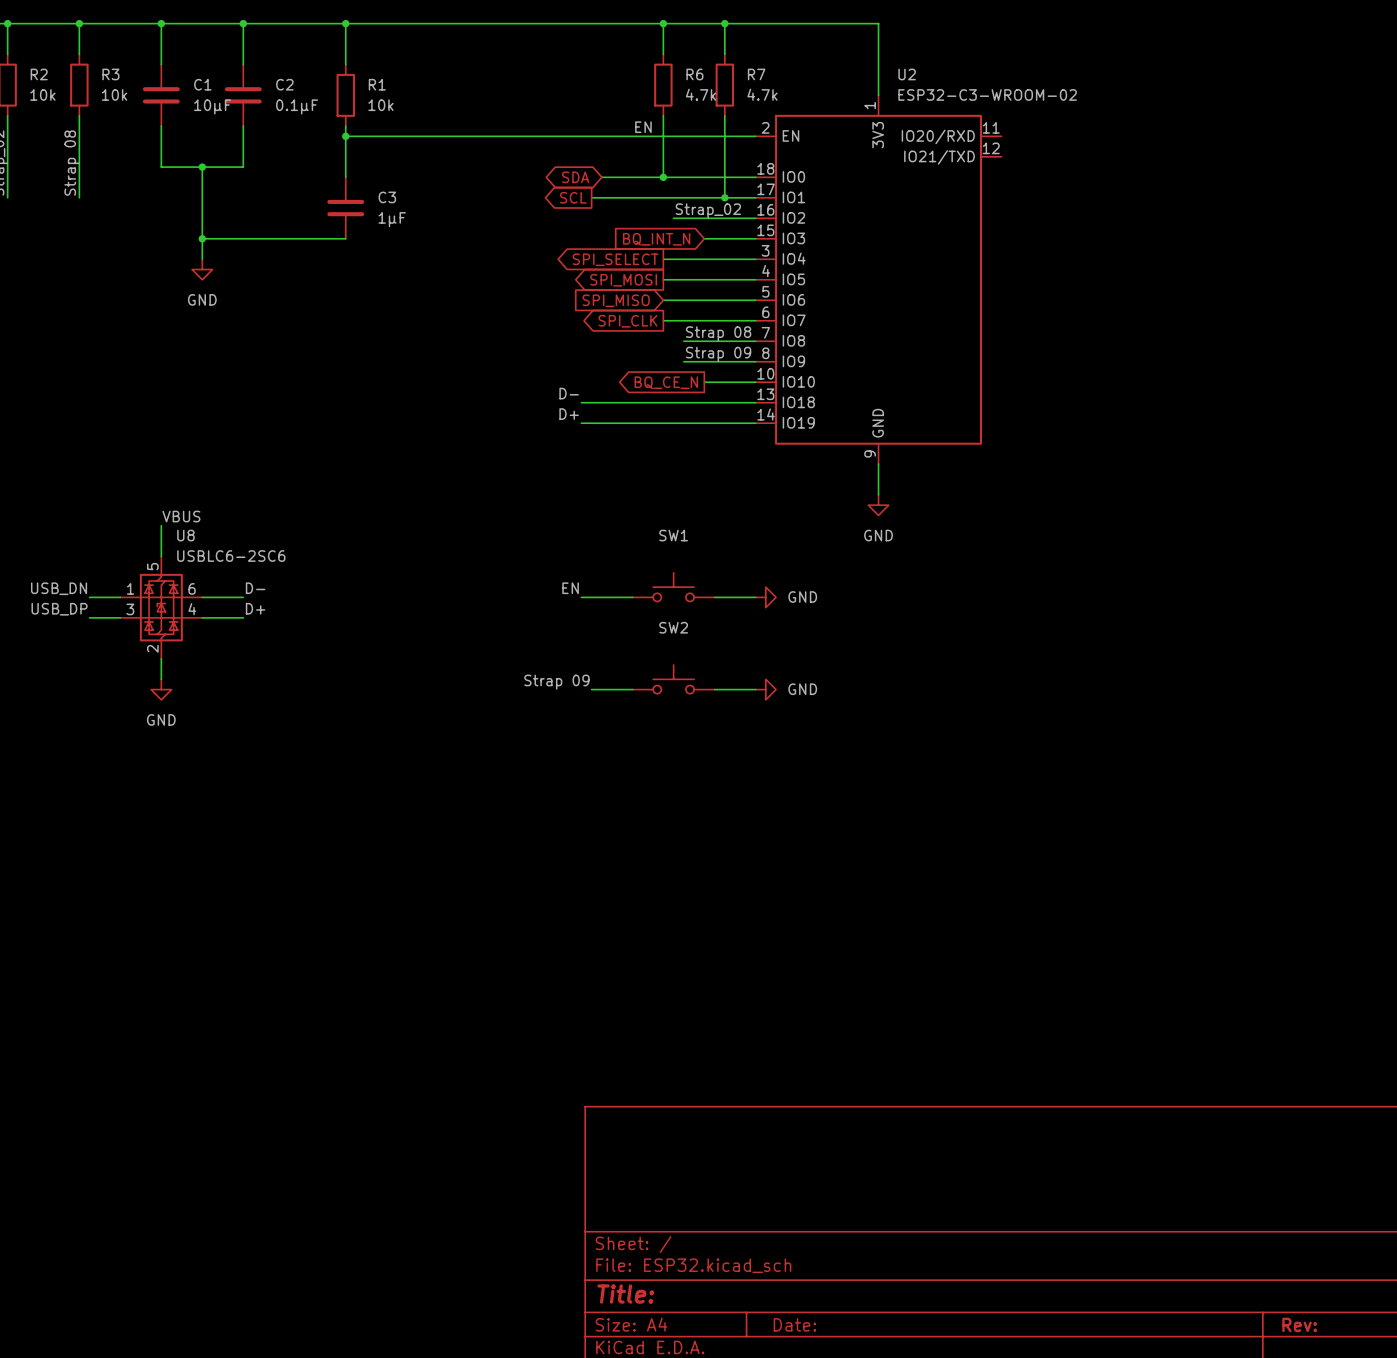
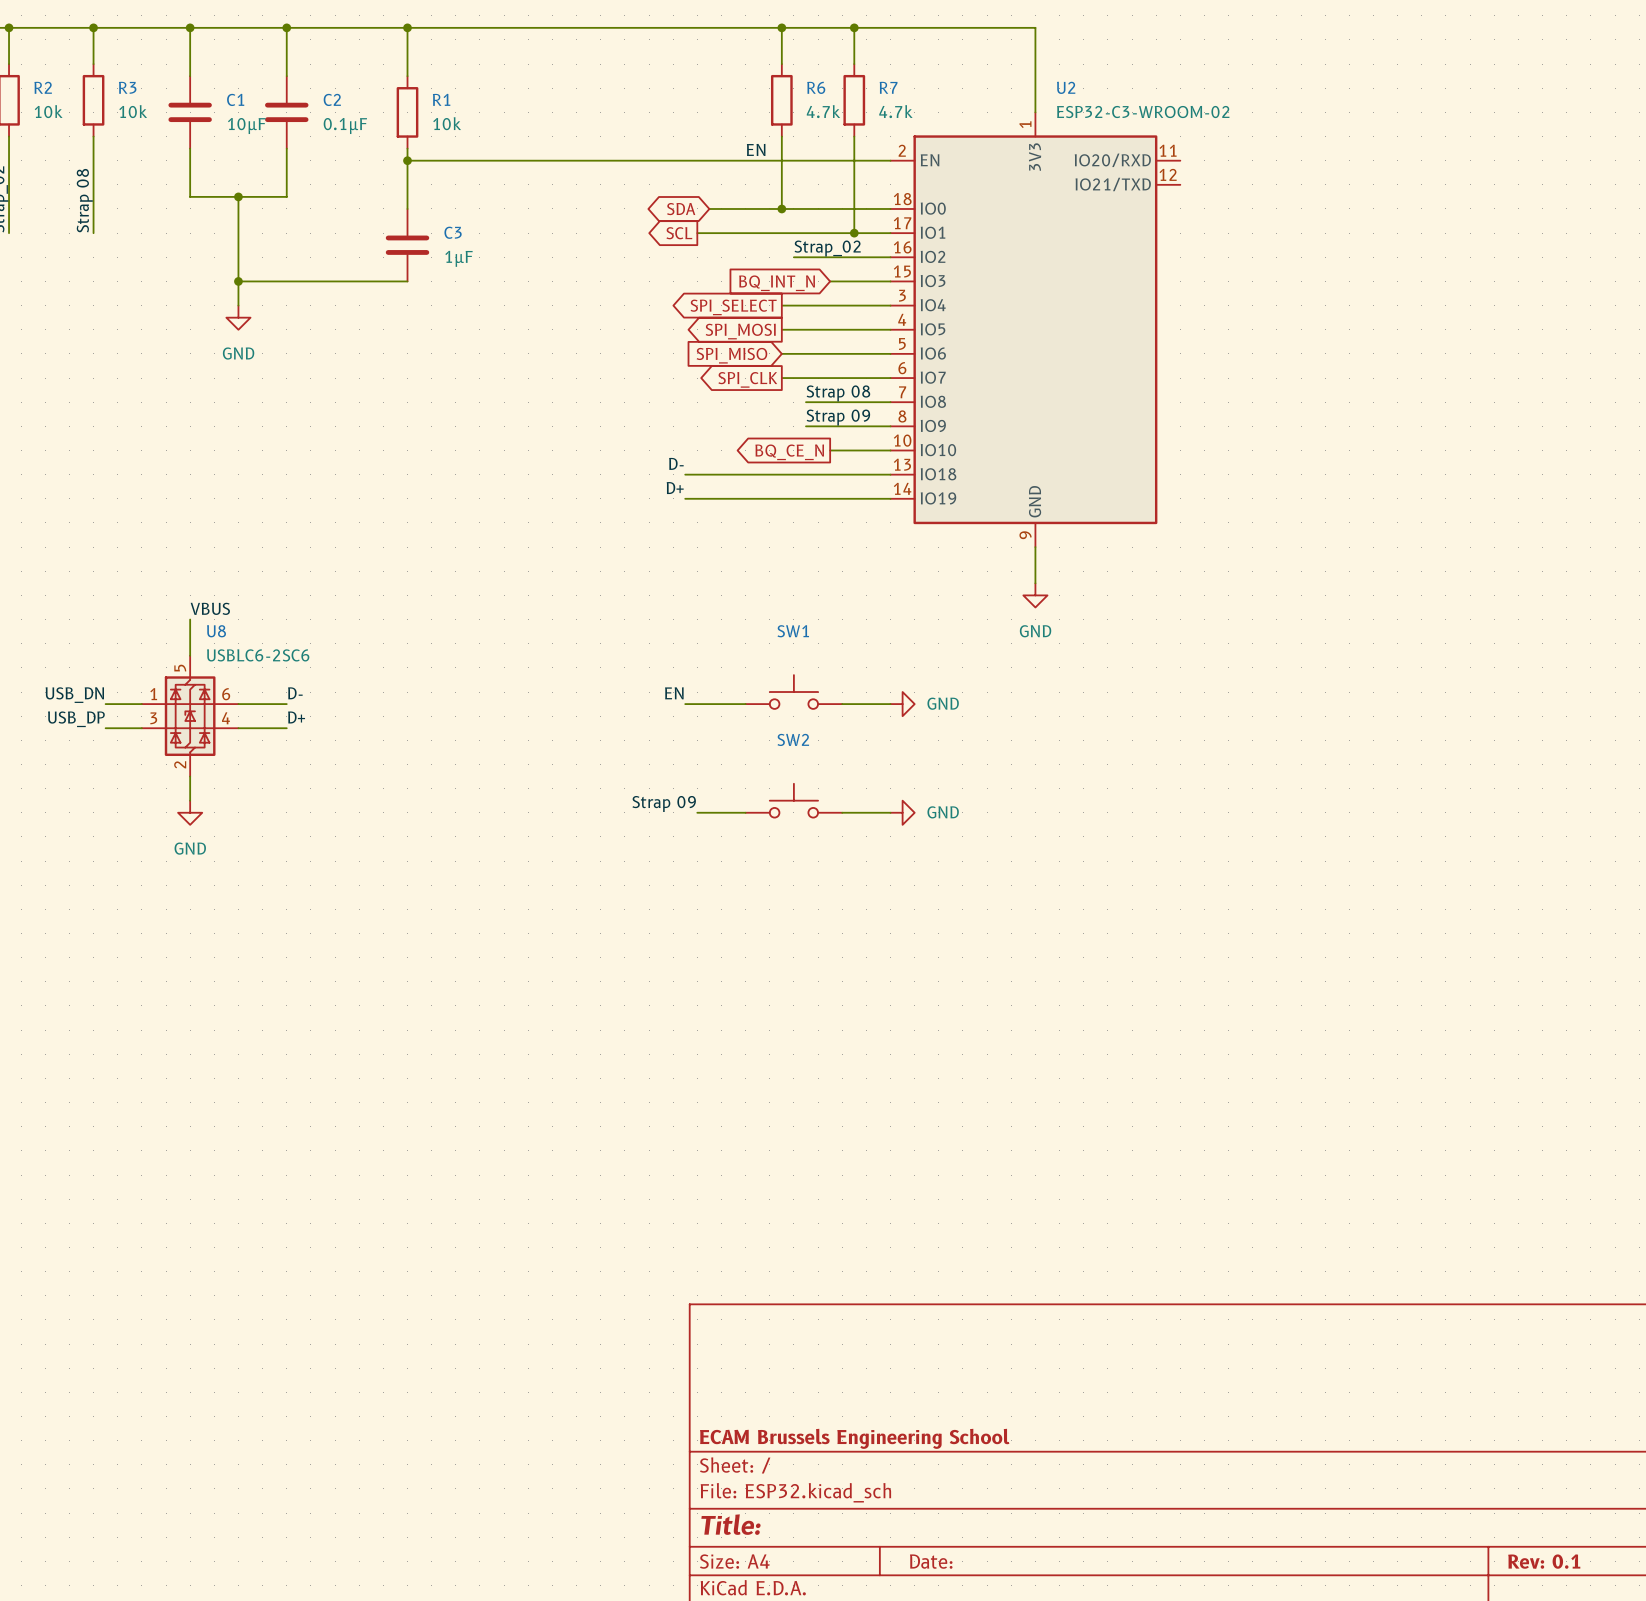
title block: none -> ECAM Brussels Engineering School (854, 1438)
title block: Rev: (1299, 1324) -> Rev: 0.1 (1544, 1561)

